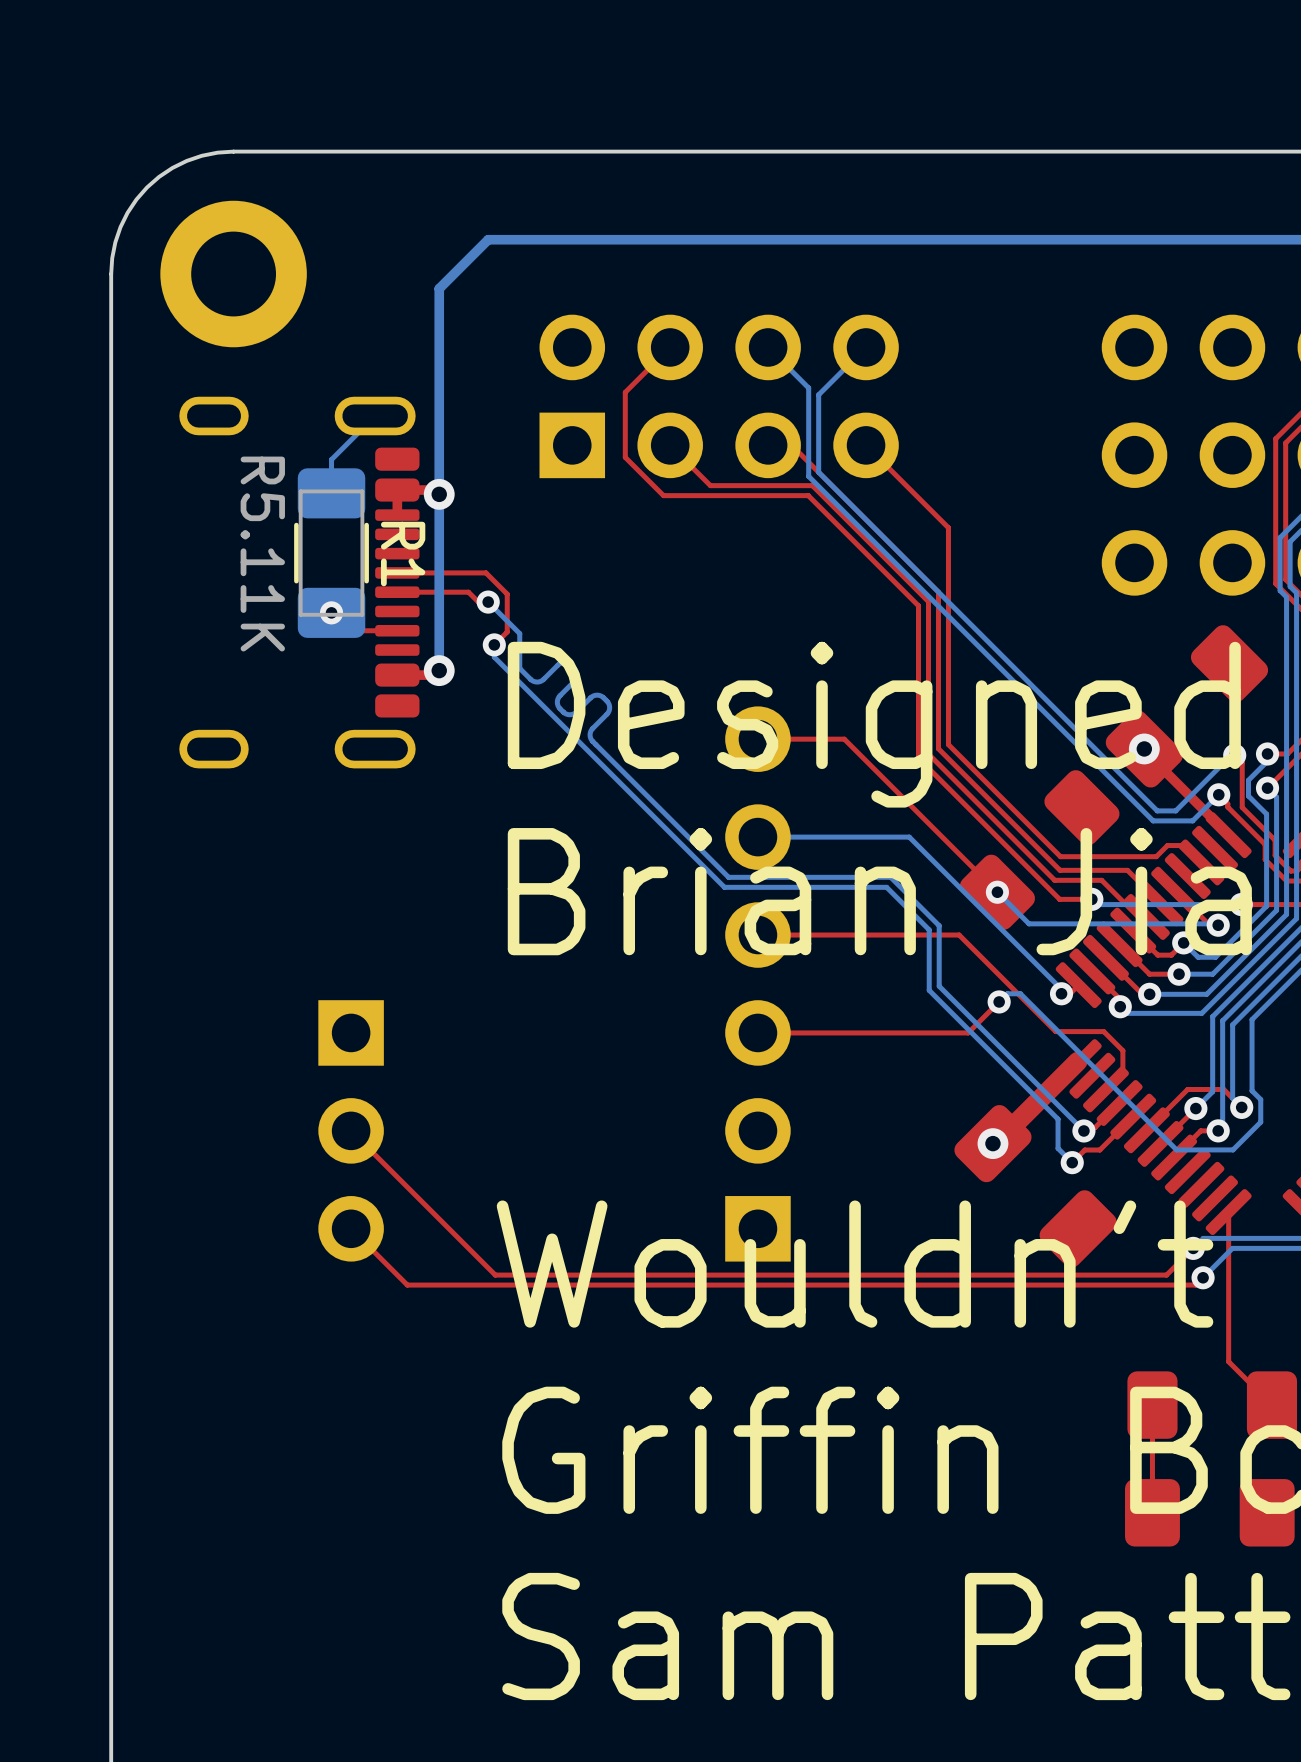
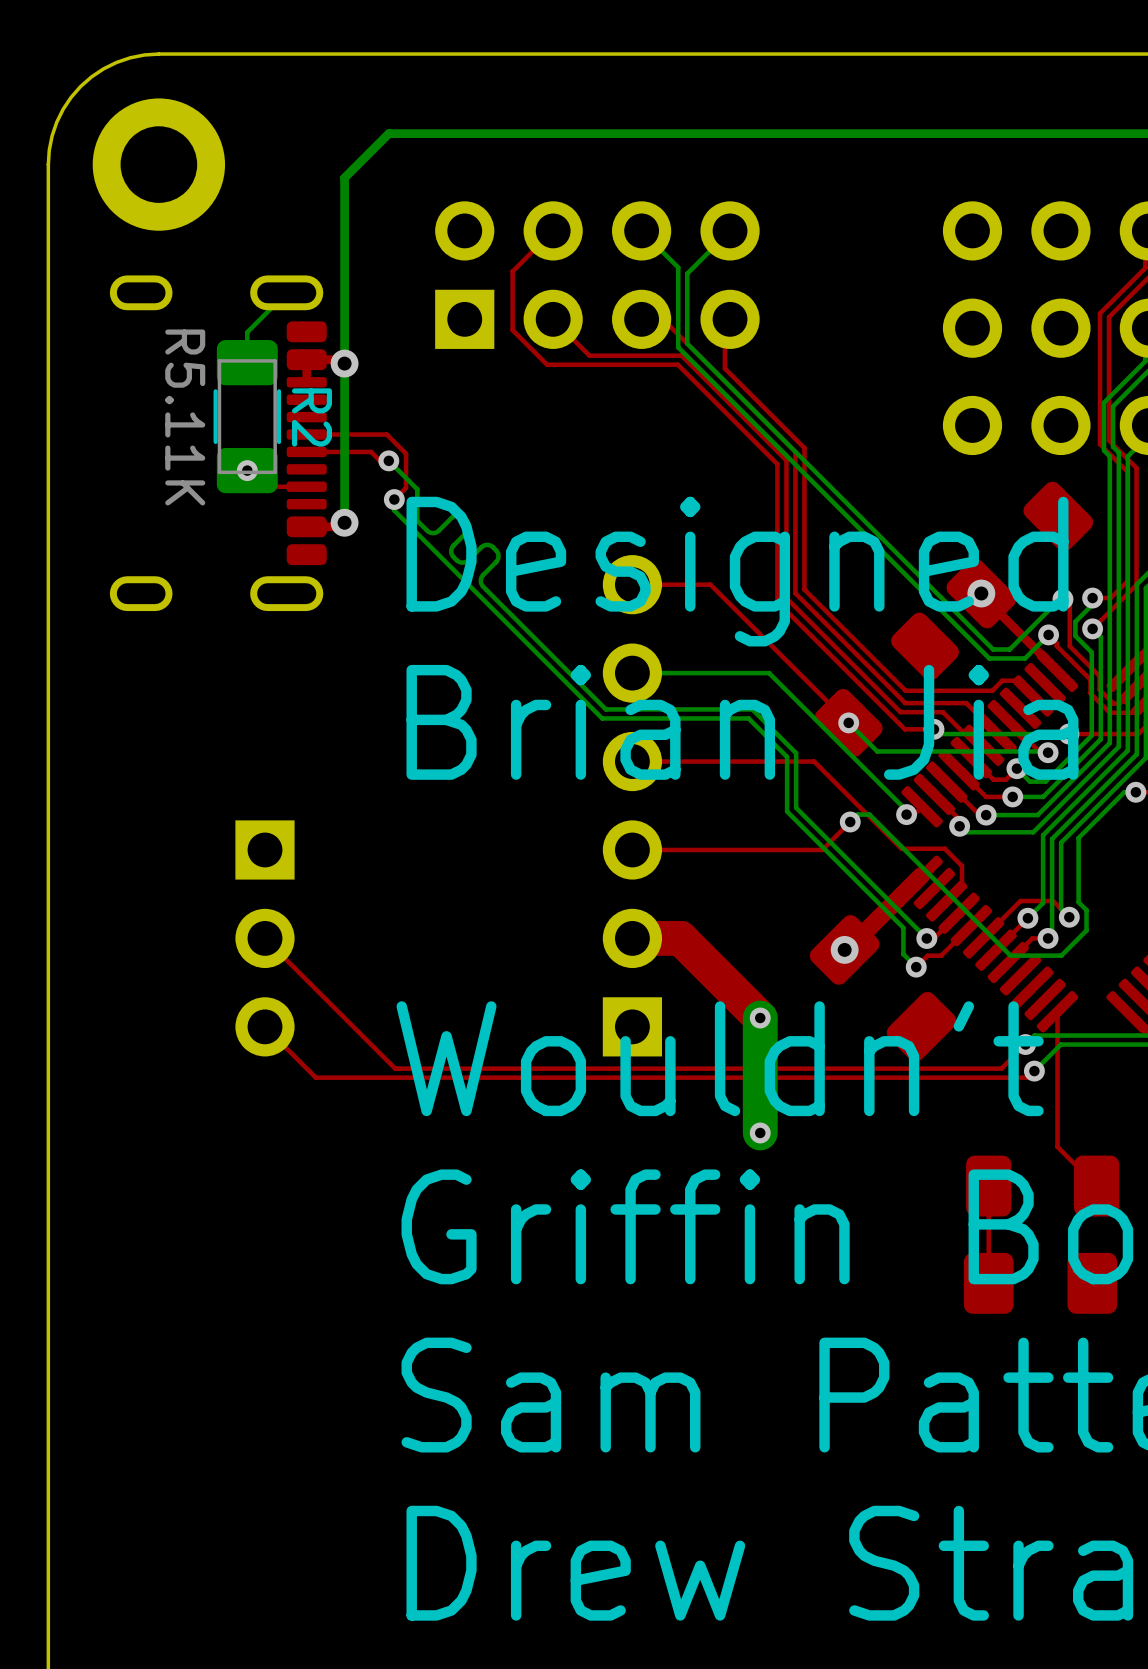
top track: (866, 445) (948, 527) (948, 587) -> (730, 319) (724, 324) (724, 368) (804, 448)
R1 name: R1 (403, 554) -> R2 (311, 417)
top track: none -> (632, 938) (680, 938) (760, 1018)
bottom track: none -> (760, 1018) (760, 1132)
via: none -> (760, 1018)
via: none -> (760, 1132)

